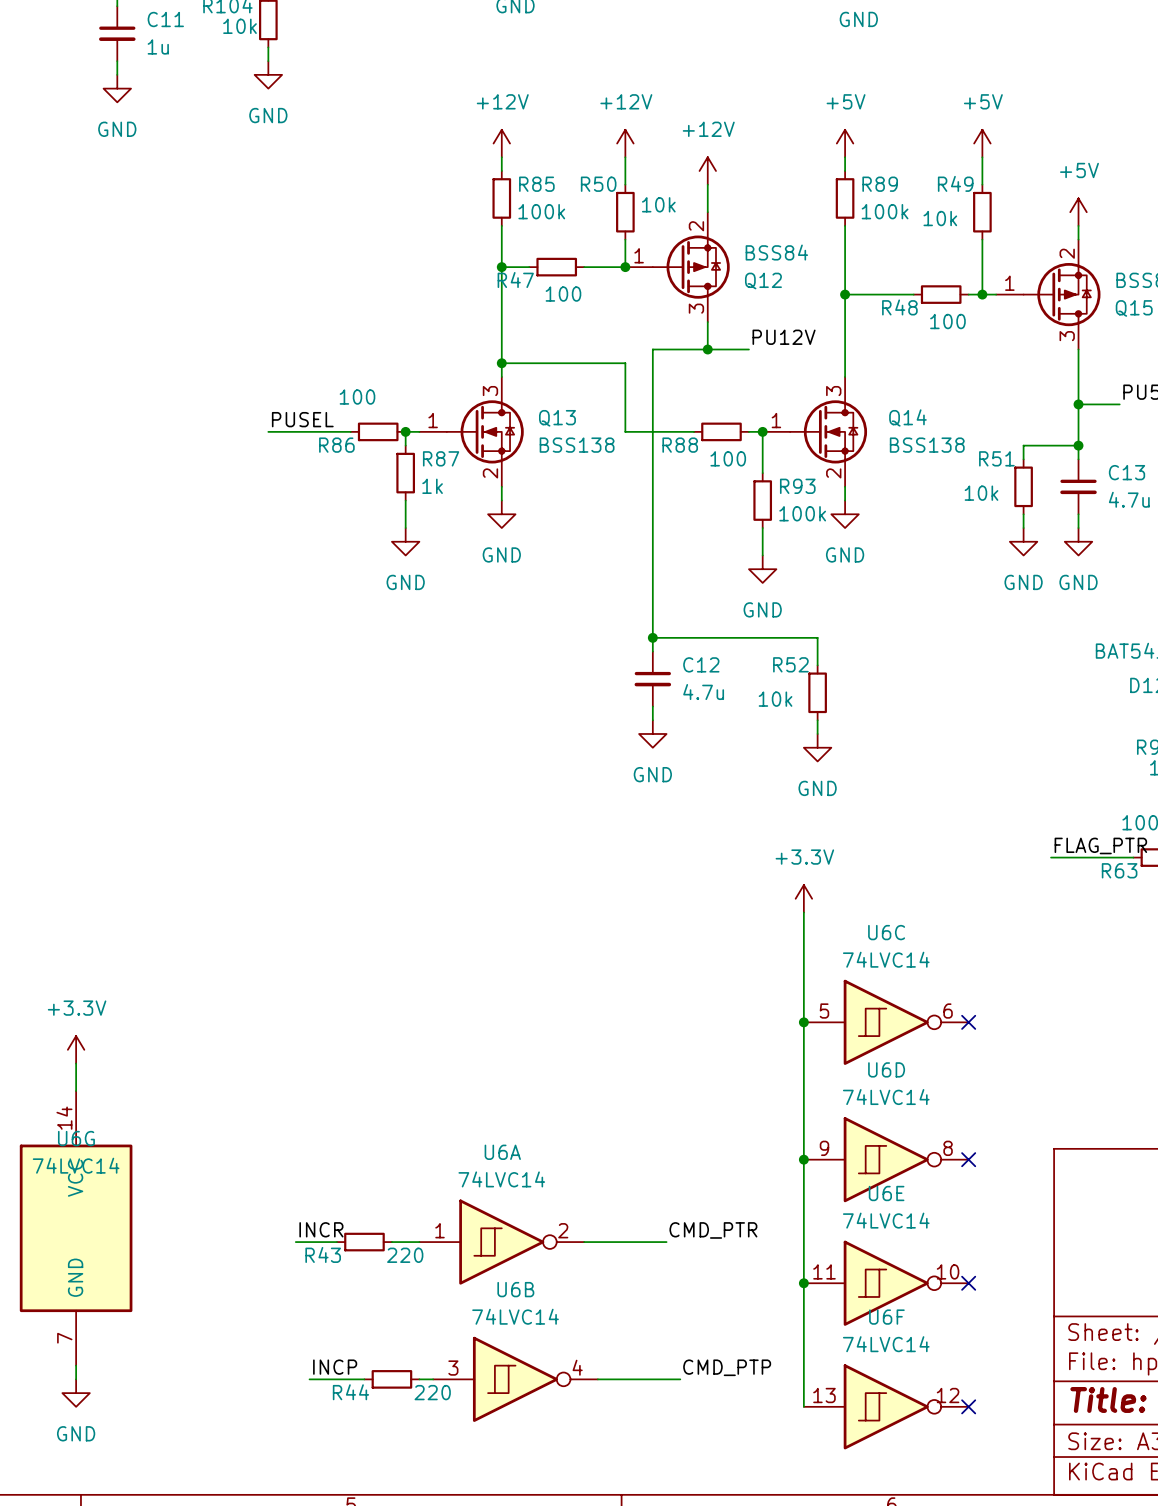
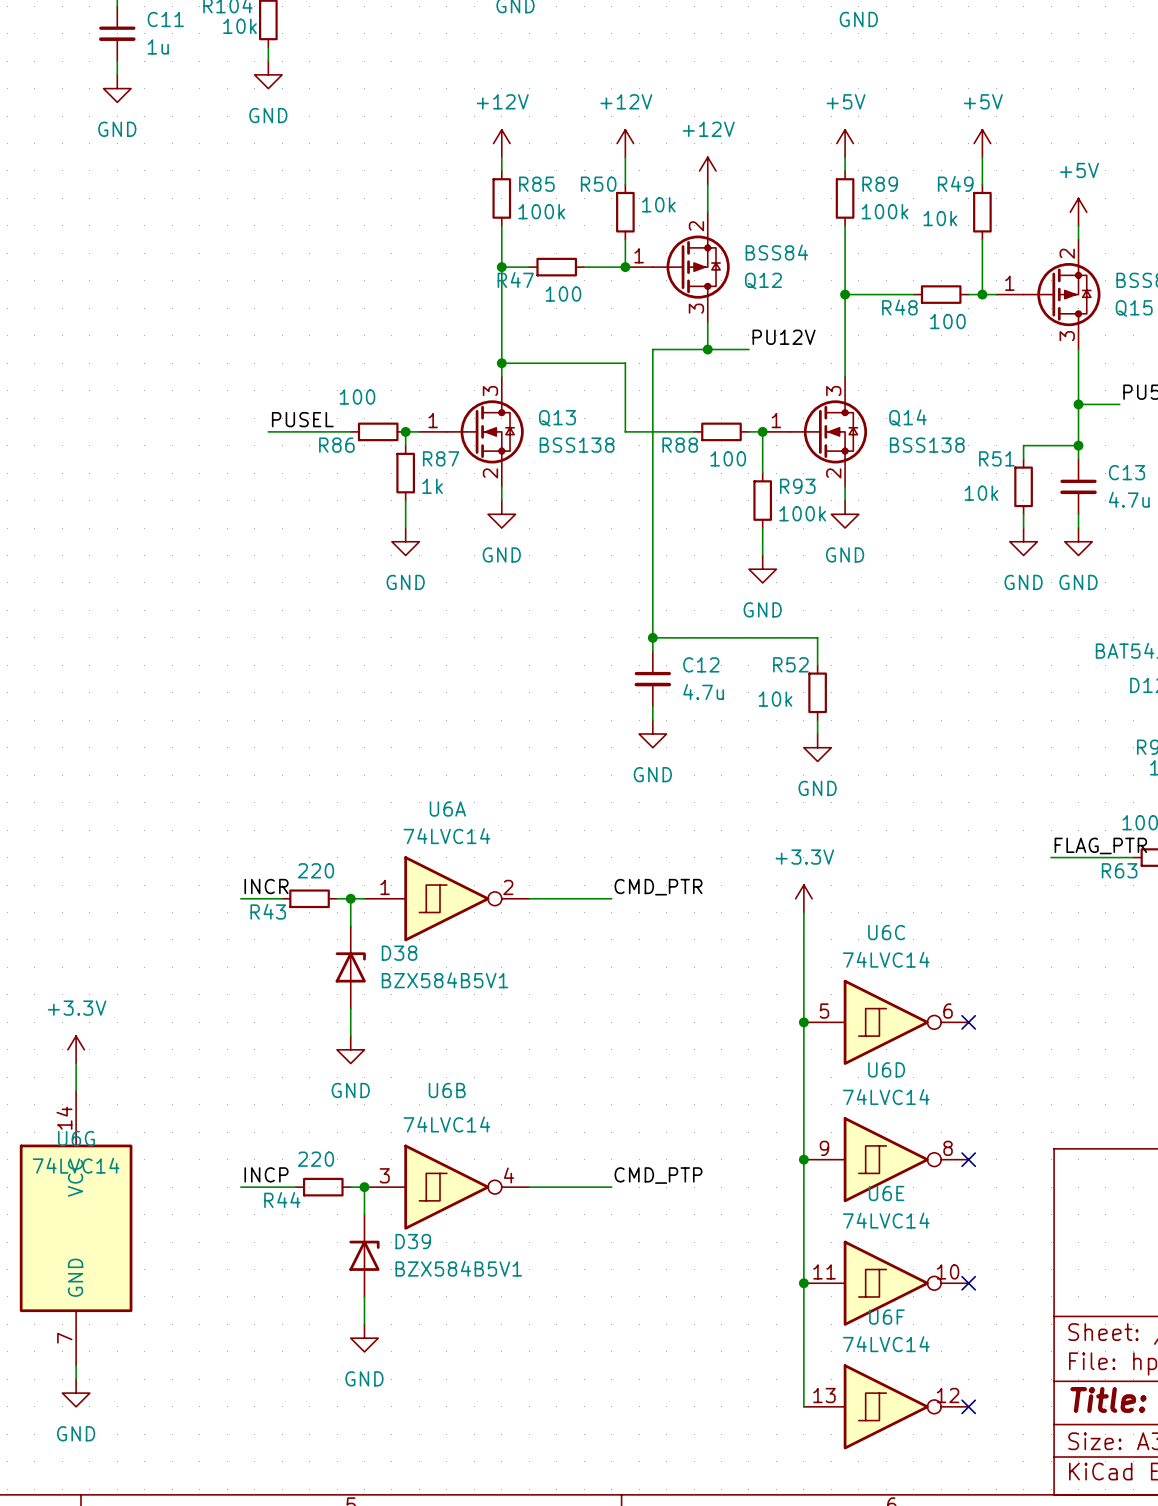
label: none -> INCR (266, 886)
label: none -> CMD_PTR (658, 887)
wire: none -> (240, 898) (282, 898)
wire: none -> (337, 898) (364, 898)
wire: none -> (350, 898) (350, 926)
junction: none -> (350, 898)
wire: none -> (529, 898) (611, 898)
D38: none -> BZX584B5V1 (350, 967)
wire: none -> (350, 1008) (350, 1036)
power symbol: none -> GND (350, 1049)
wire: none -> (350, 1187) (364, 1187) (364, 1214)
junction: none -> (364, 1187)
label: INCR (321, 1229) -> none
label: CMD_PTR (713, 1230) -> none
wire: (295, 1242) (337, 1242) -> none
R43 position: (364, 1242) -> (309, 898)
wire: (391, 1242) (419, 1242) -> none
U6A position: (501, 1242) -> (446, 898)
wire: (584, 1242) (666, 1242) -> none
D39: none -> BZX584B5V1 (364, 1255)
R43 value position: 220 (405, 1255) -> 220 (315, 870)
U6B name position: U6B (515, 1289) -> U6B (447, 1090)
wire: none -> (364, 1296) (364, 1324)
power symbol: none -> GND (364, 1338)
label position: INCP (335, 1367) -> INCP (266, 1174)
label position: CMD_PTP (727, 1367) -> CMD_PTP (658, 1175)
wire: (309, 1379) (364, 1379) -> (240, 1187) (295, 1187)
R44 position: (391, 1379) -> (323, 1187)
wire: (419, 1379) (433, 1379) -> none
U6B position: (515, 1379) -> (446, 1187)
wire: (597, 1379) (680, 1379) -> (529, 1187) (611, 1187)
R44 value position: 220 (432, 1392) -> 220 (315, 1159)

